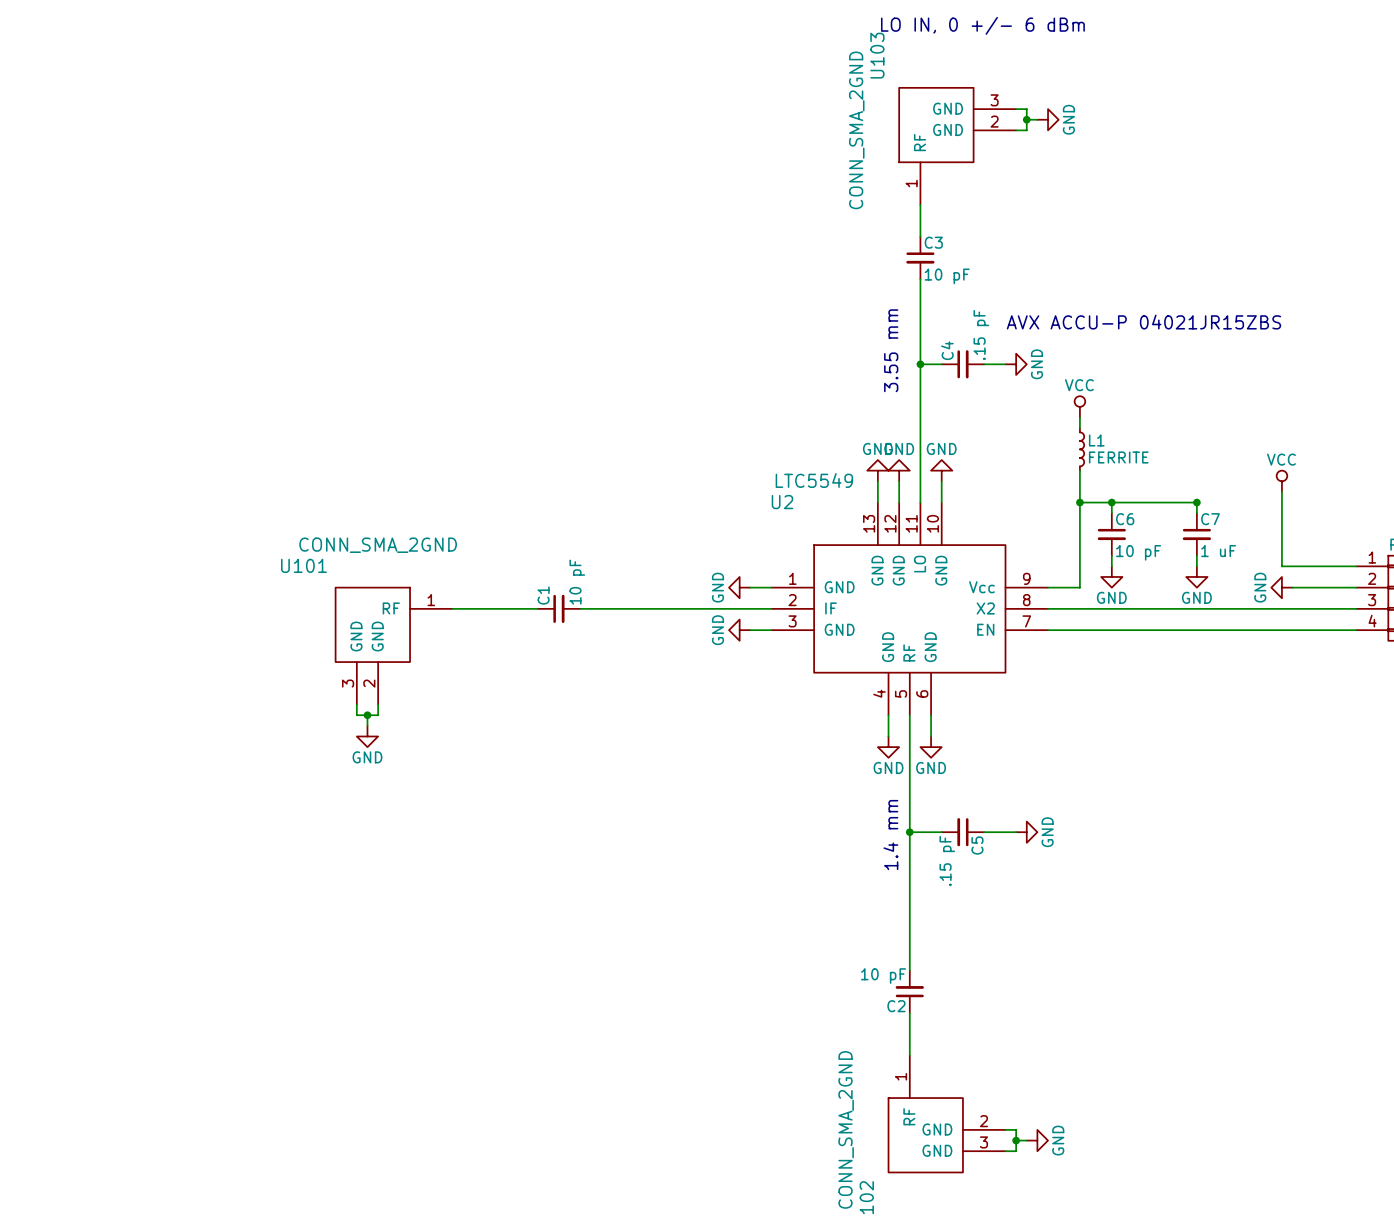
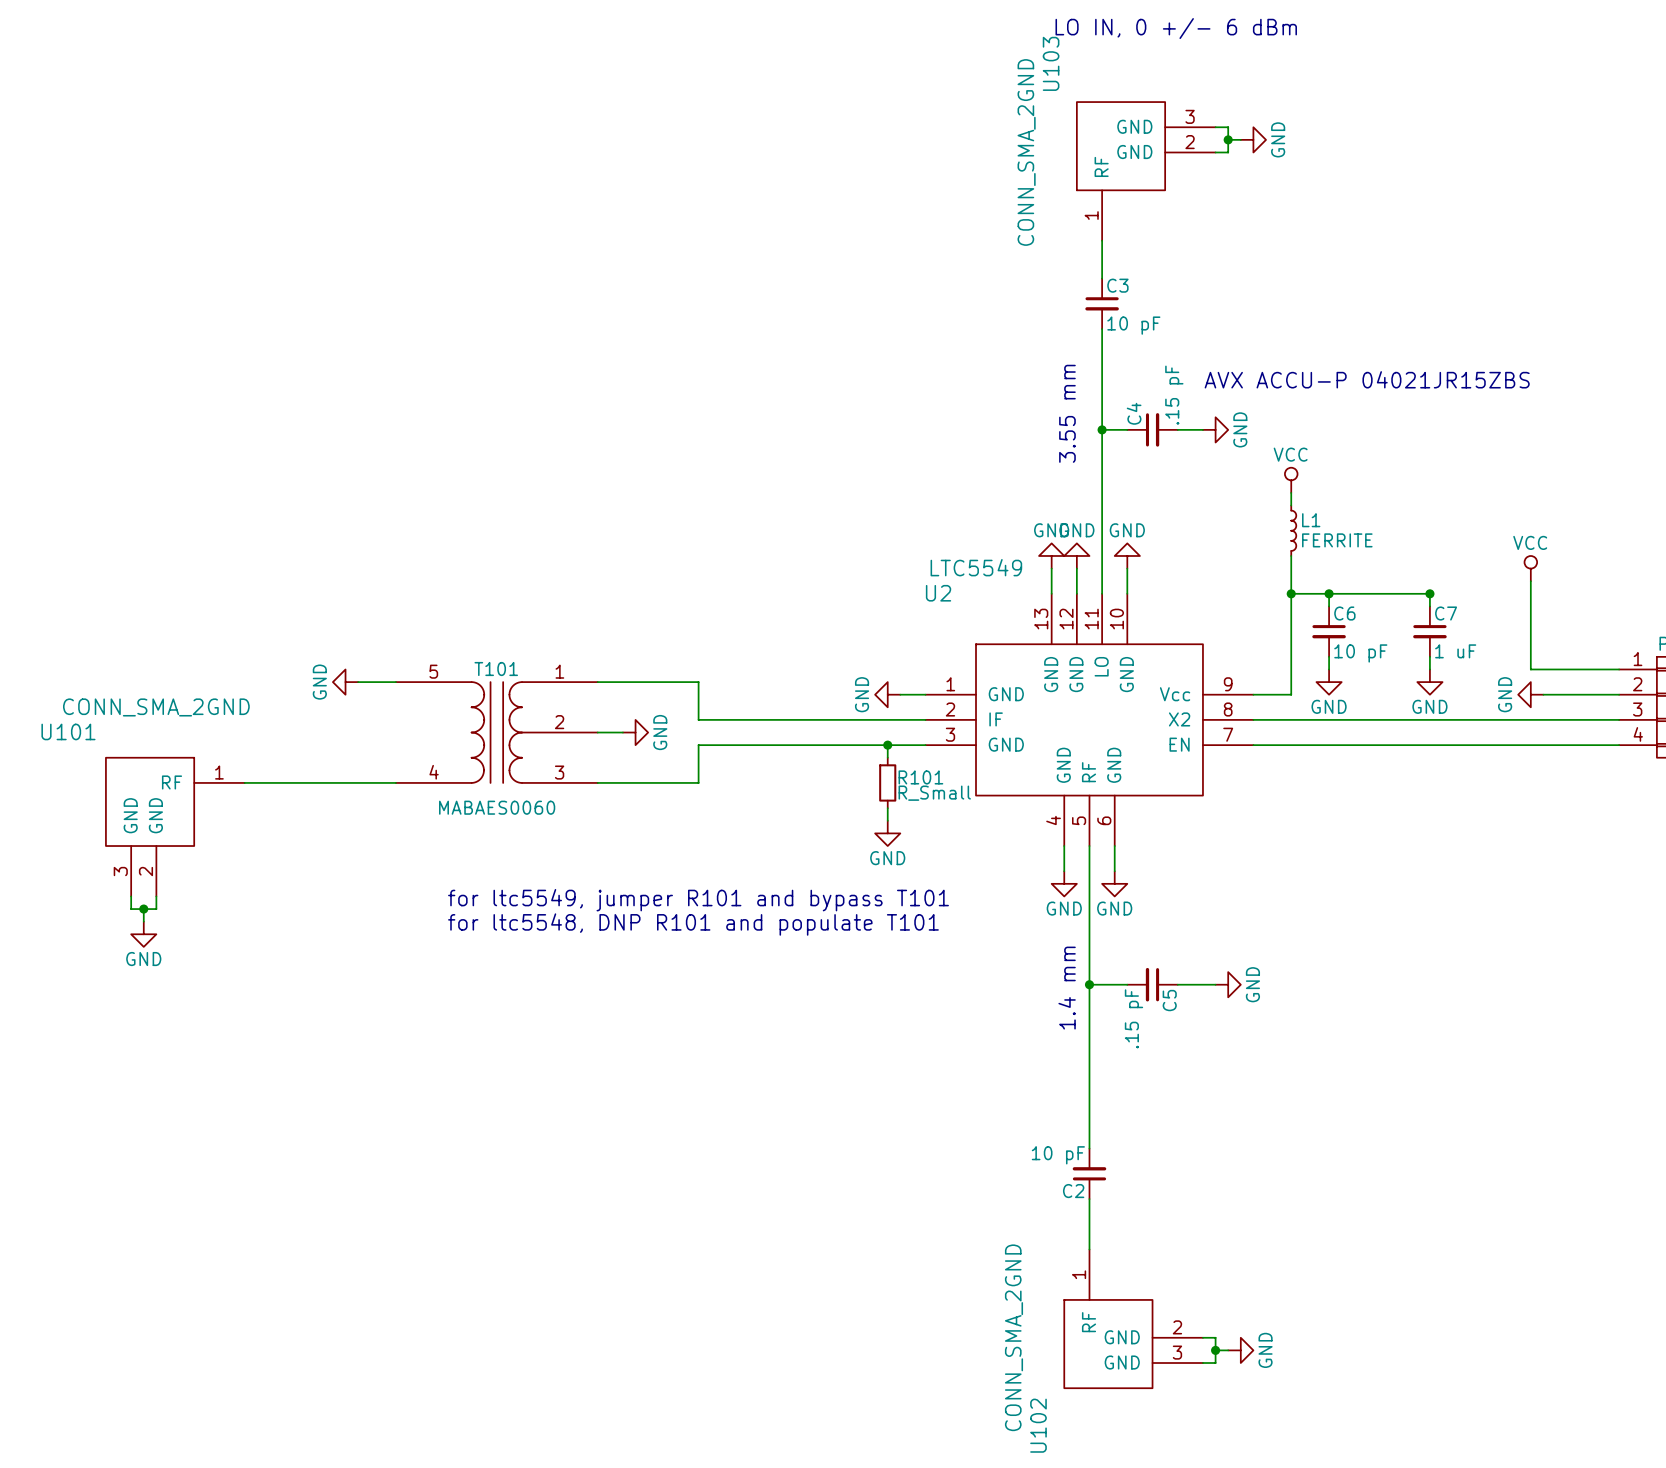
power symbol: none -> GND (345, 682)
wire: none -> (358, 682) (395, 682)
wire: none -> (597, 682) (698, 682) (698, 719)
wire: (452, 608) (537, 608) -> none
C1: 10 pF (558, 608) -> none
T101: none -> MABAES0060 (496, 732)
wire: none -> (597, 732) (622, 732)
power symbol: none -> GND (635, 732)
power symbol rotation: 0° (739, 630) -> 90° counterclockwise (887, 833)
power symbol position: GND (739, 630) -> GND (887, 833)
junction: none -> (887, 745)
wire: none -> (900, 745) (698, 745) (698, 782) (597, 782)
U101 position: (394, 646) -> (175, 827)
wire: none -> (244, 782) (395, 782)
R101: none -> R_Small (887, 782)
wire: none -> (887, 808) (887, 820)
wire: (356, 704) (356, 715) (378, 715) (378, 704) -> none
wire: (367, 715) (367, 725) -> none
junction: (367, 715) -> none
power symbol: GND (367, 736) -> none
wire: none -> (131, 896) (131, 909) (156, 909) (156, 896)
text: none -> for ltc5549, jumper R101 and bypass T101 (698, 900)
wire: none -> (143, 909) (143, 921)
junction: none -> (143, 909)
text: none -> for ltc5548, DNP R101 and populate T101 (693, 924)
power symbol: none -> GND (143, 934)

